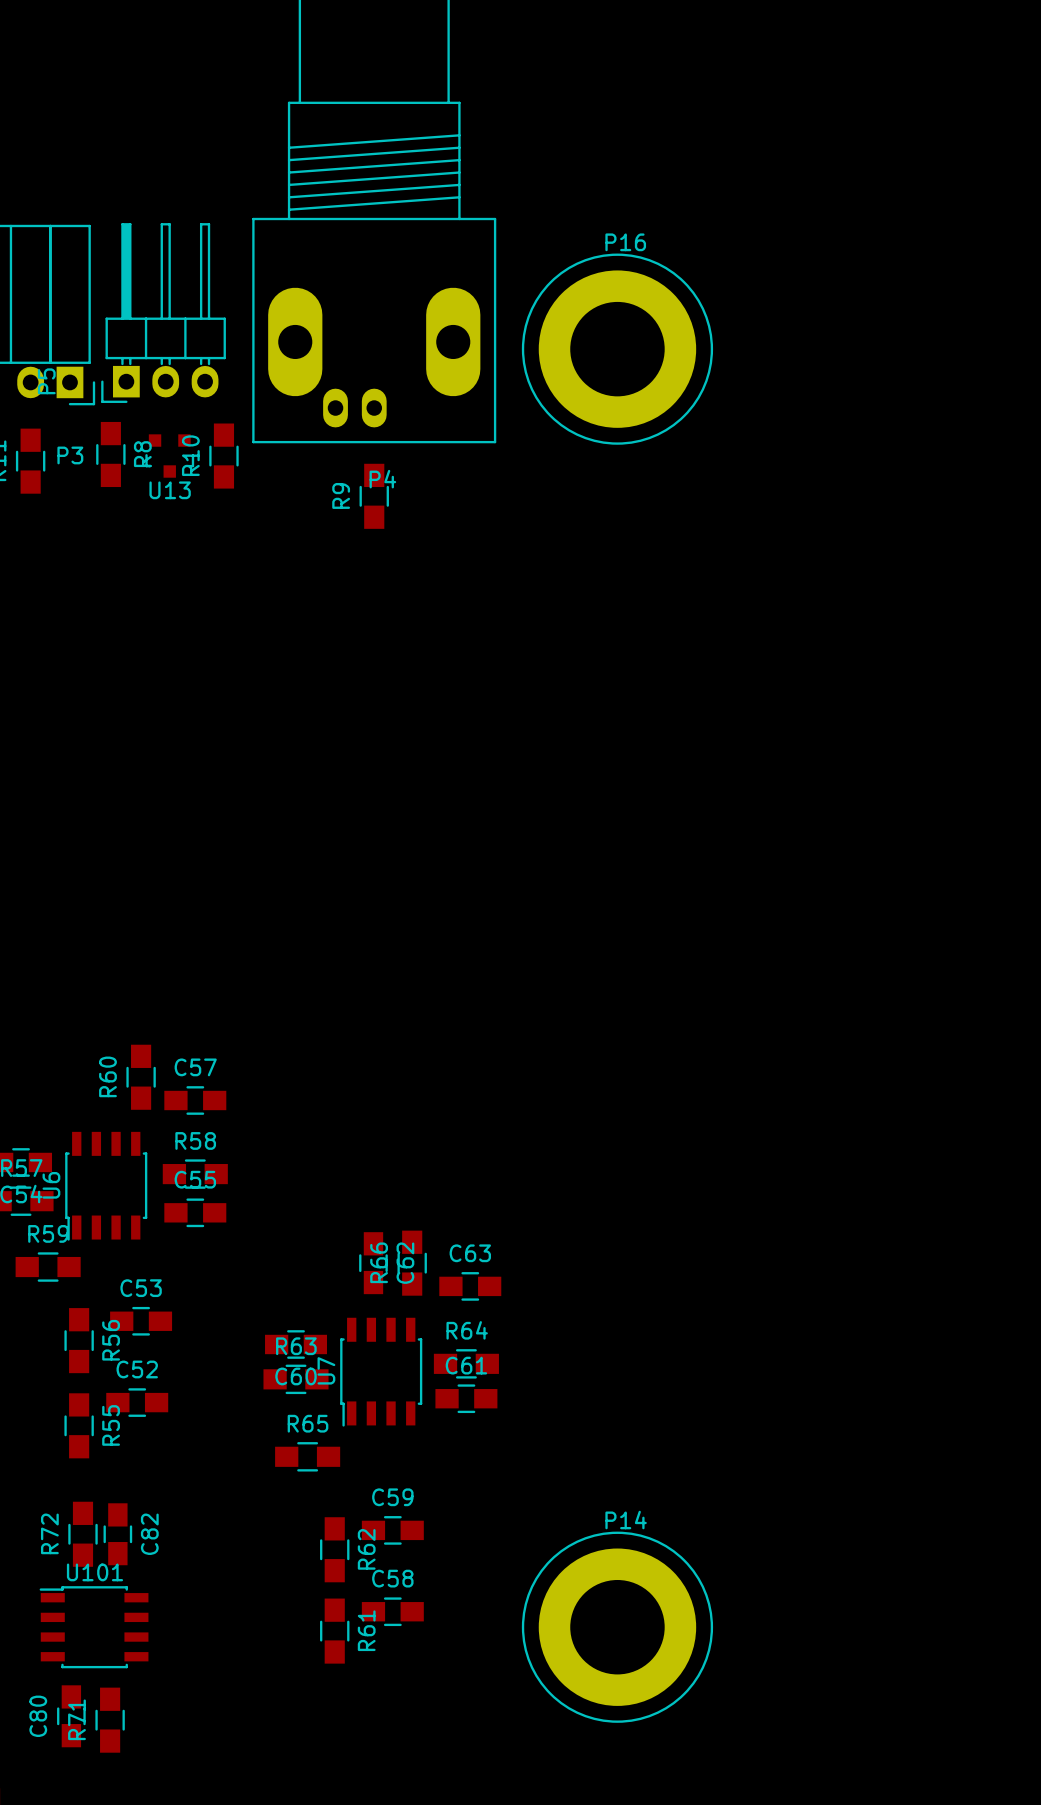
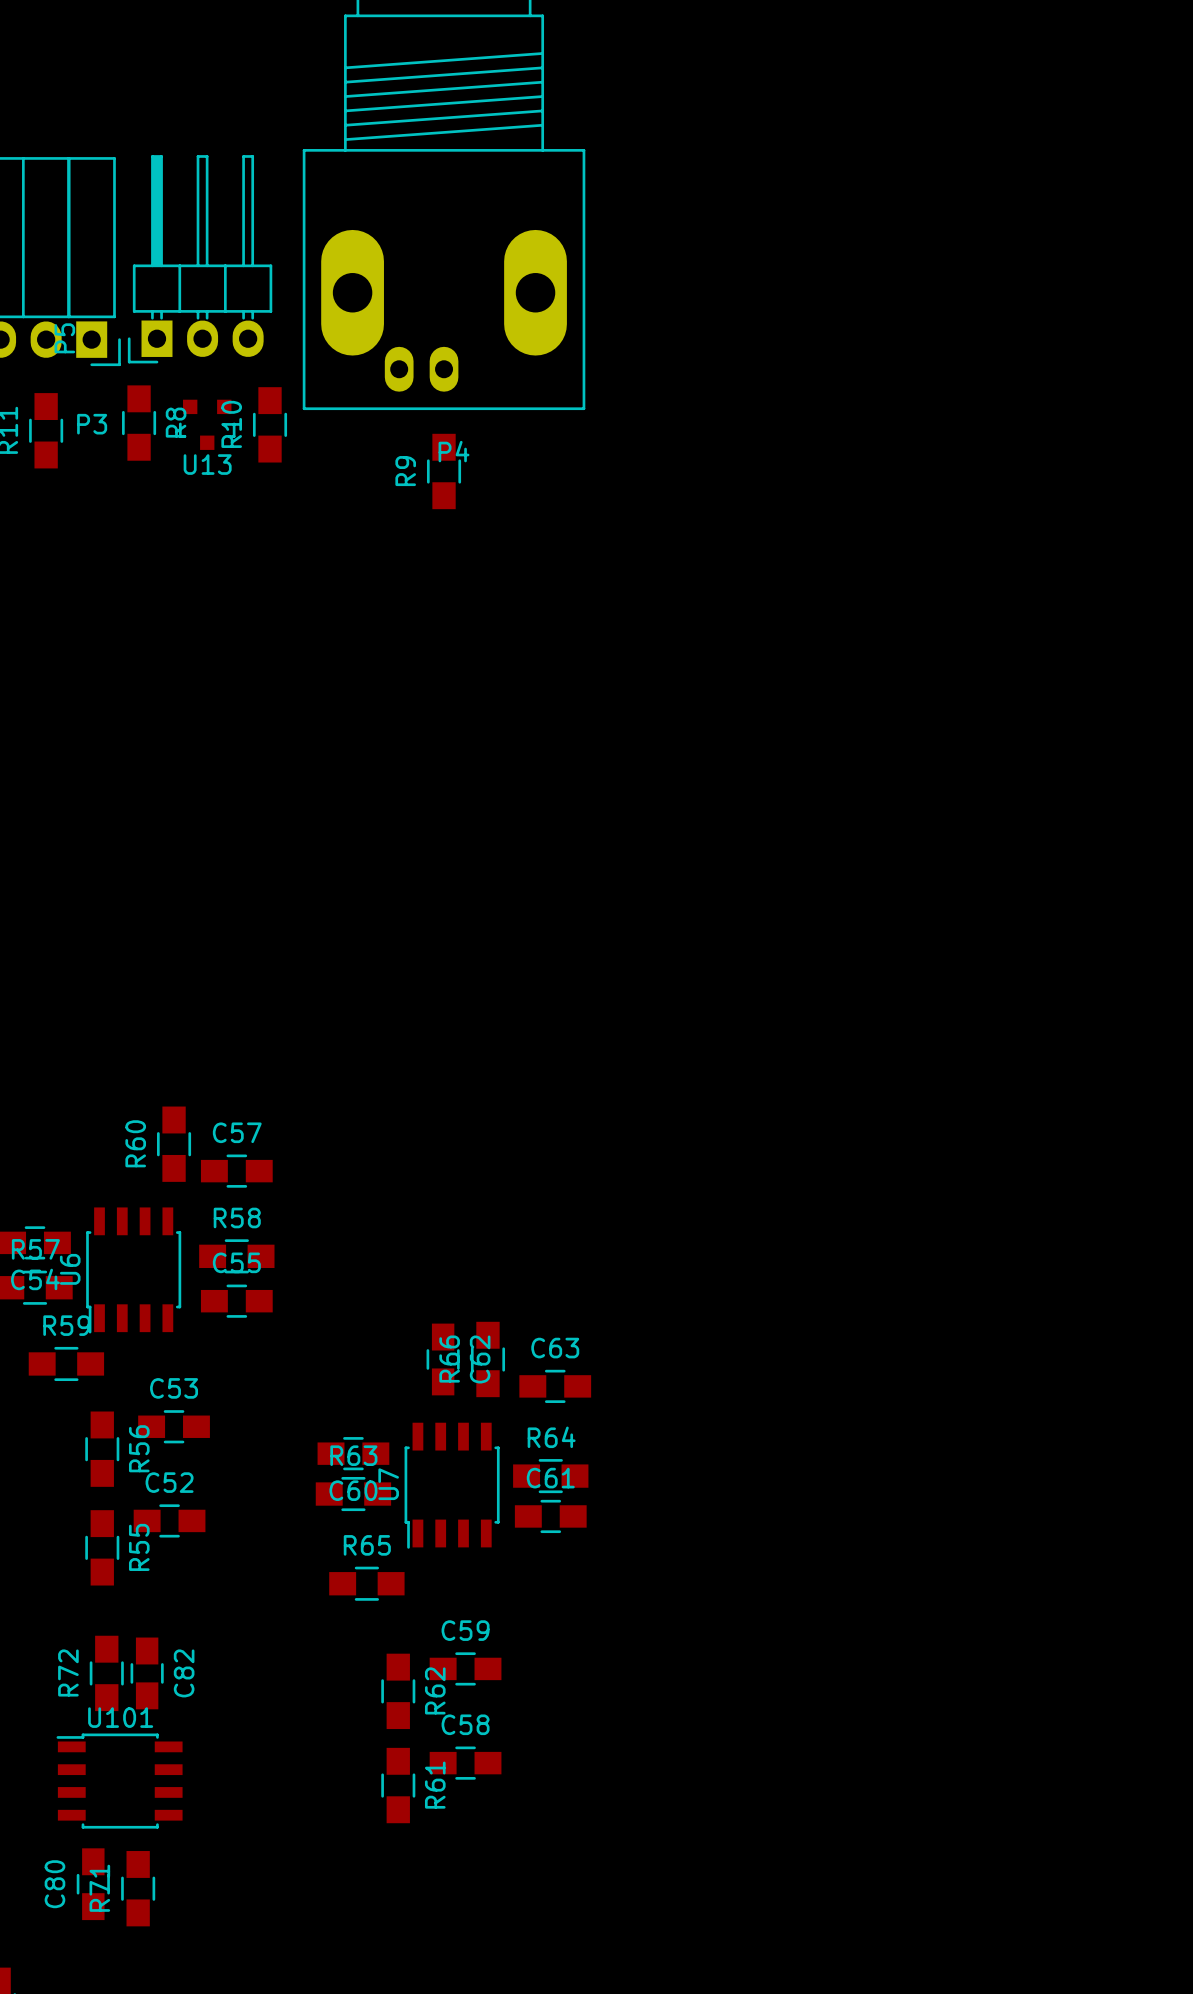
P16: (617, 349) -> none
P14: (617, 1627) -> none

